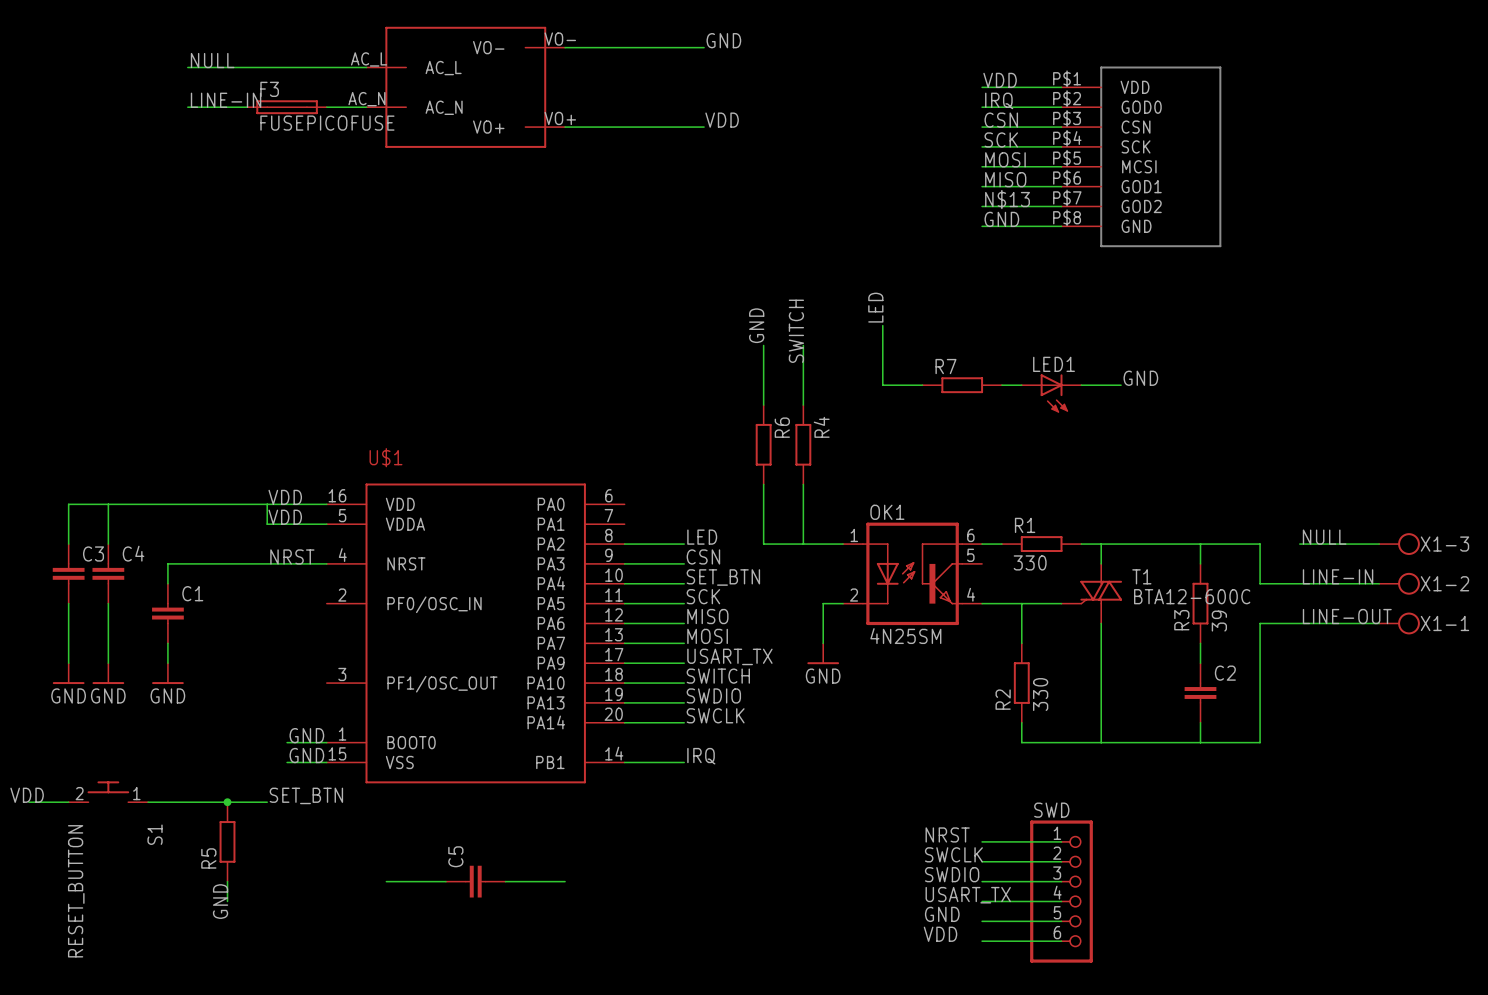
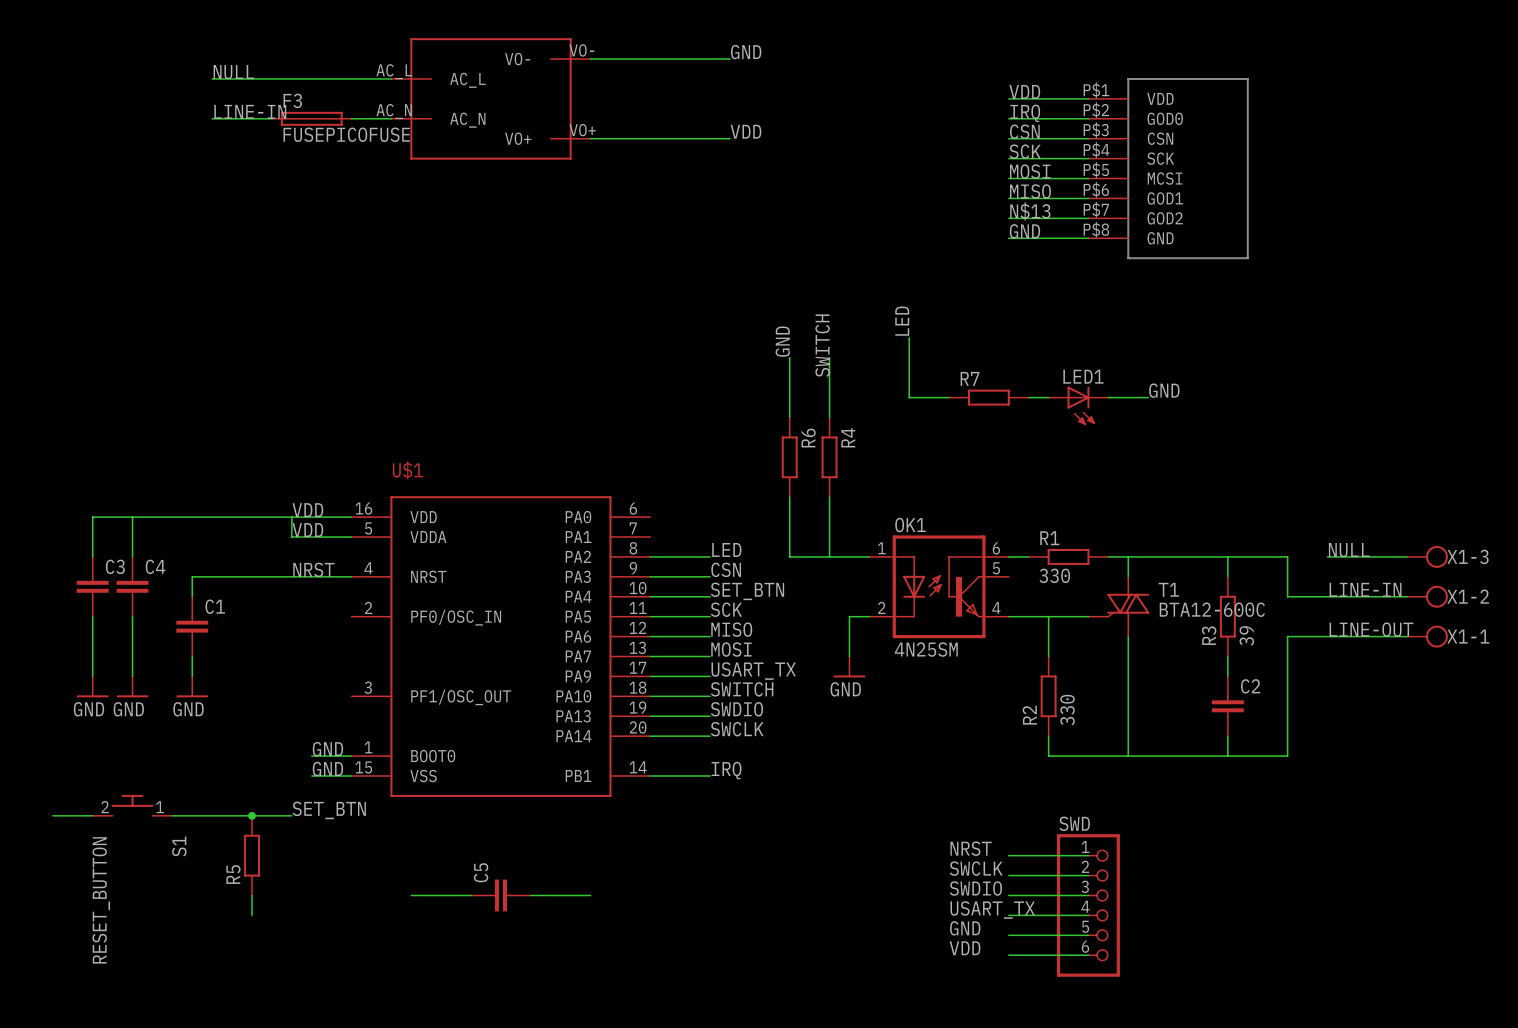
label: VDD (27, 795) -> none
label: GND (220, 901) -> none

